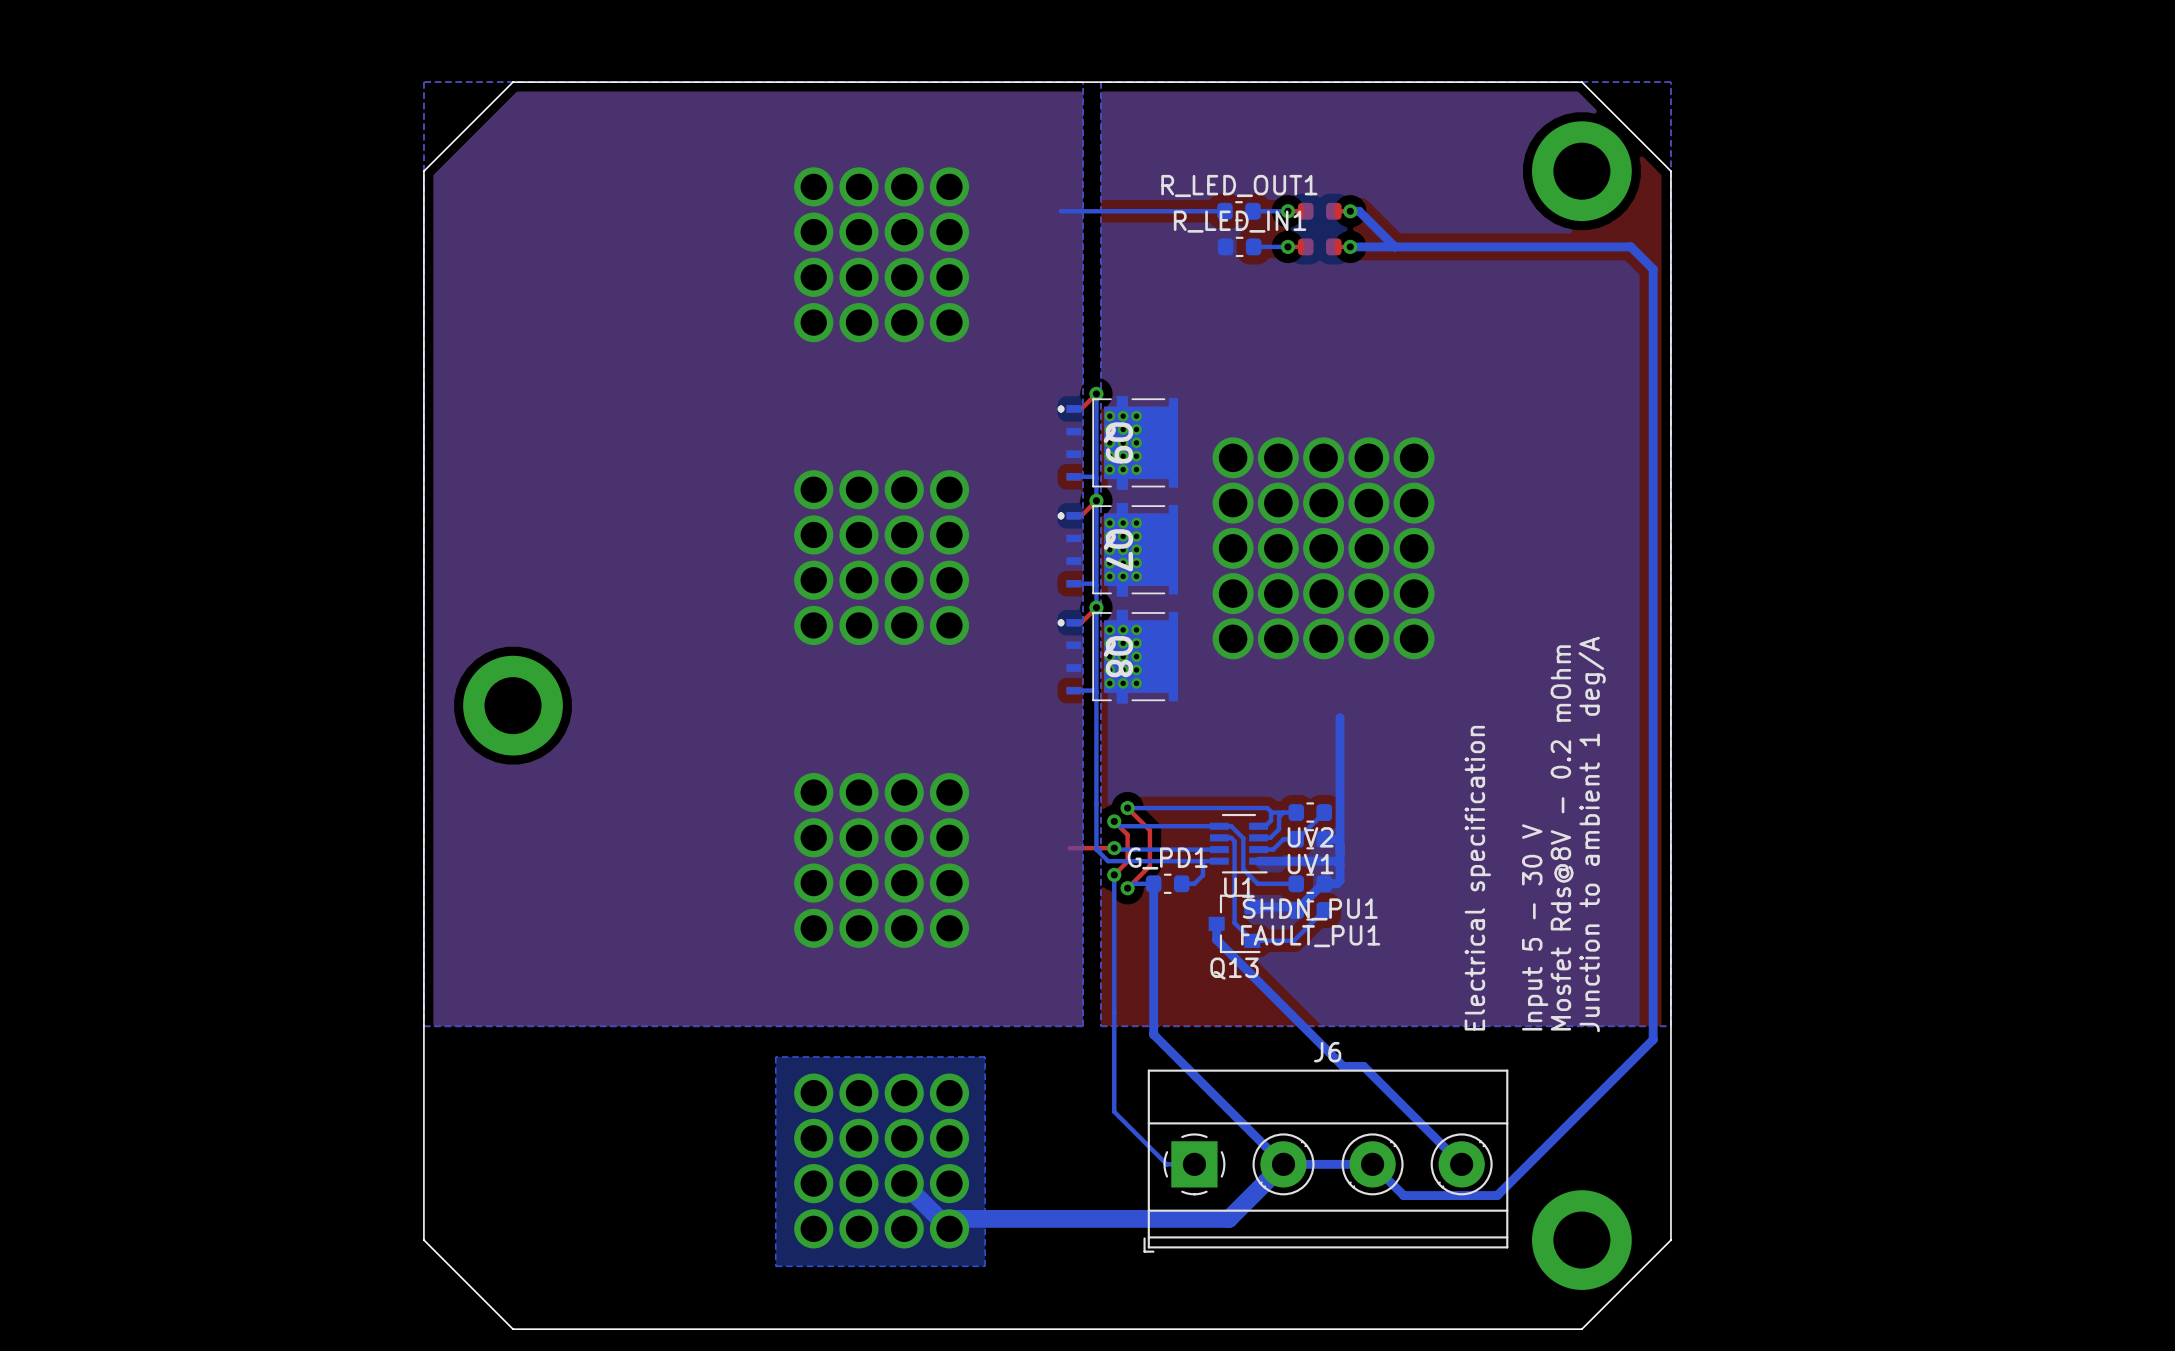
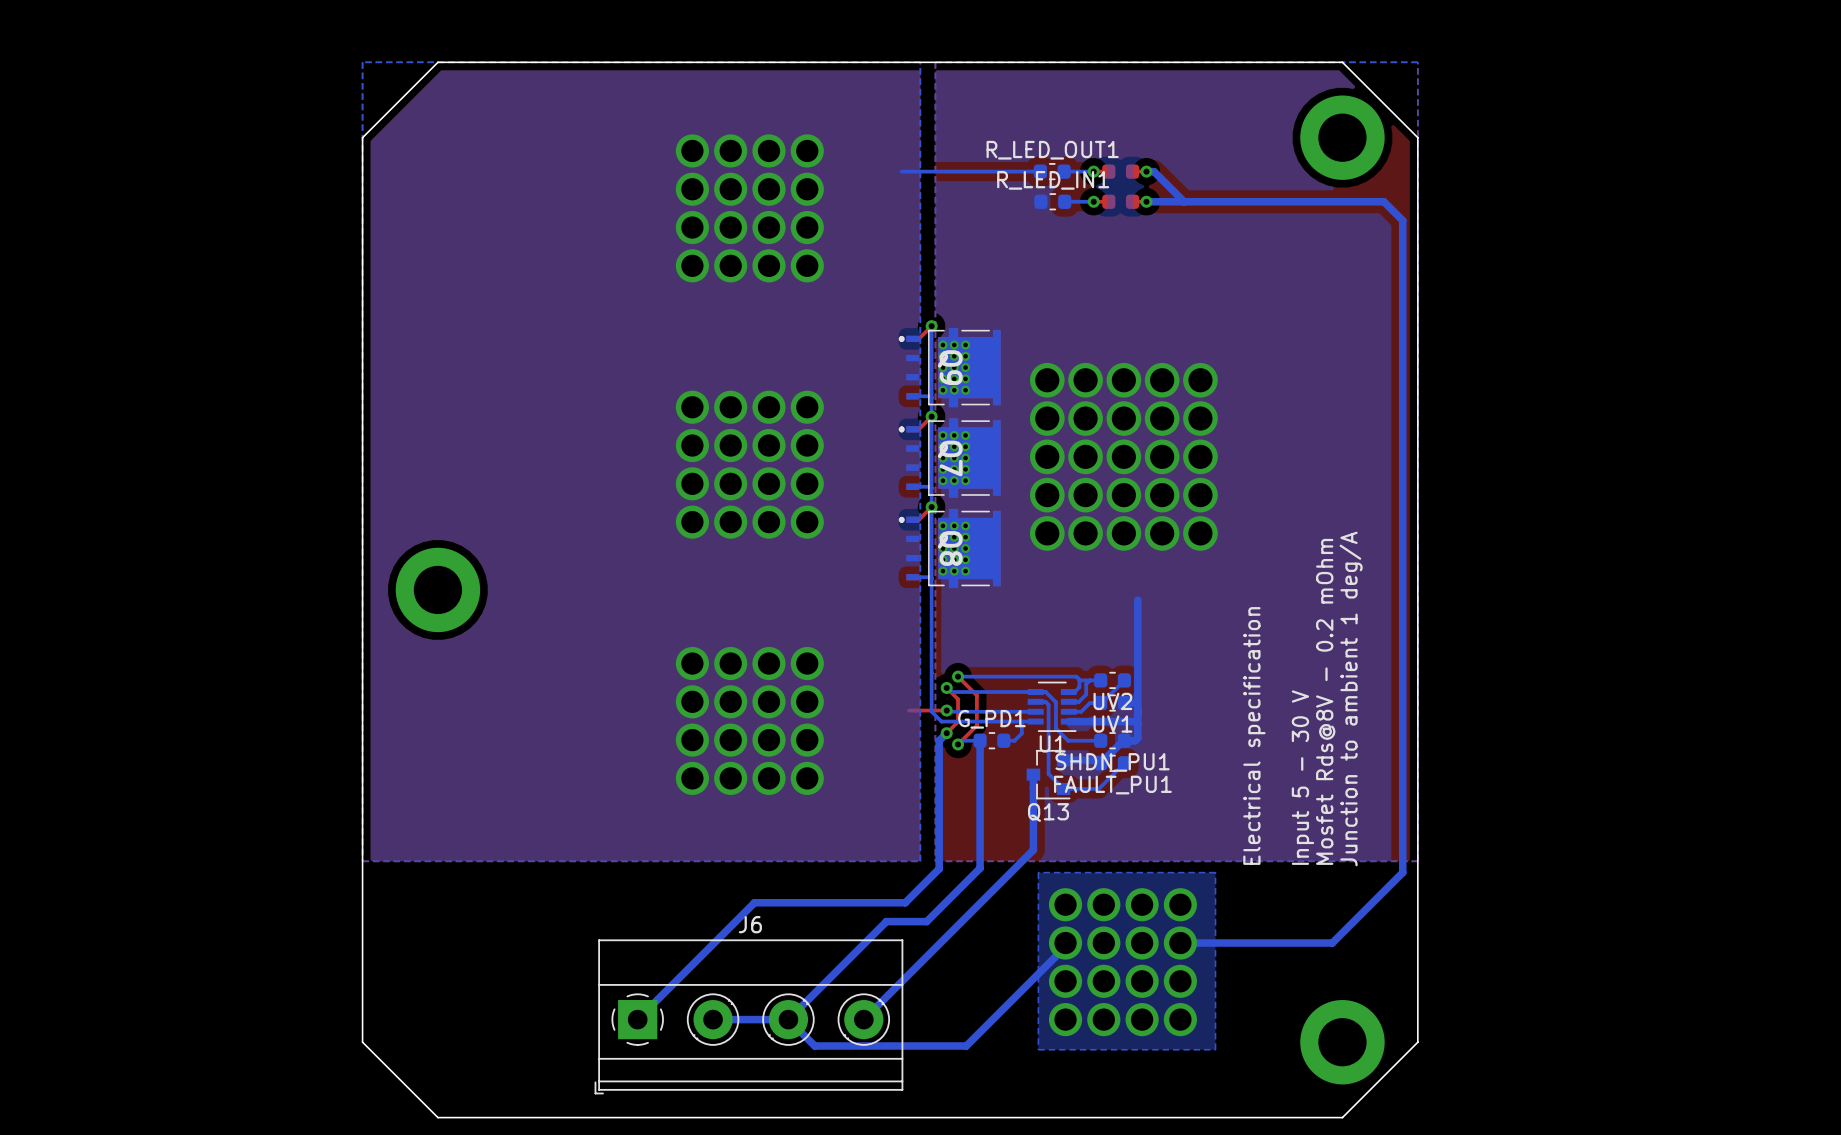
bottom track: (1114, 874) (1114, 1111) (1166, 1164) (1194, 1164) (1194, 1146) -> (946, 733) (939, 740) (939, 868) (905, 902) (754, 902) (637, 1019) (637, 1004)
bottom track: (1216, 939) (1343, 1066) (1363, 1066) (1461, 1164) -> (1033, 788) (1033, 850) (863, 1019)
bottom track: (1153, 1034) (1283, 1164) -> (980, 868) (926, 921) (886, 921) (788, 1019)
bottom zone outline: none -> (1215, 872) (1215, 1049) (1038, 1049) (1038, 872) (1215, 872)
bottom zone outline: (985, 1056) (985, 1266) (775, 1266) (775, 1056) (985, 1056) -> none
bottom track: none -> (1069, 943) (966, 1045) (814, 1045) (788, 1019)
bottom track: (1569, 1122) (1497, 1195) (1403, 1195) (1372, 1164) (1283, 1164) -> (1332, 943) (1184, 943)
part position: (881, 1160) -> (1122, 962)
J6 position: (1325, 1161) -> (748, 1016)
bottom track: (1283, 1164) (1228, 1218) (939, 1218) (904, 1183) -> none
bottom track: none -> (788, 1019) (713, 1019)

